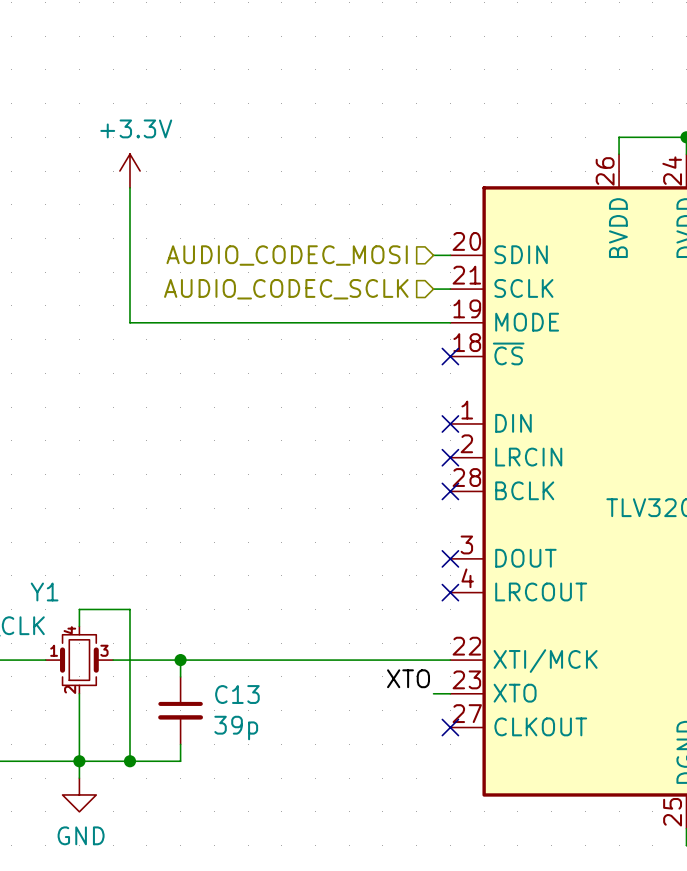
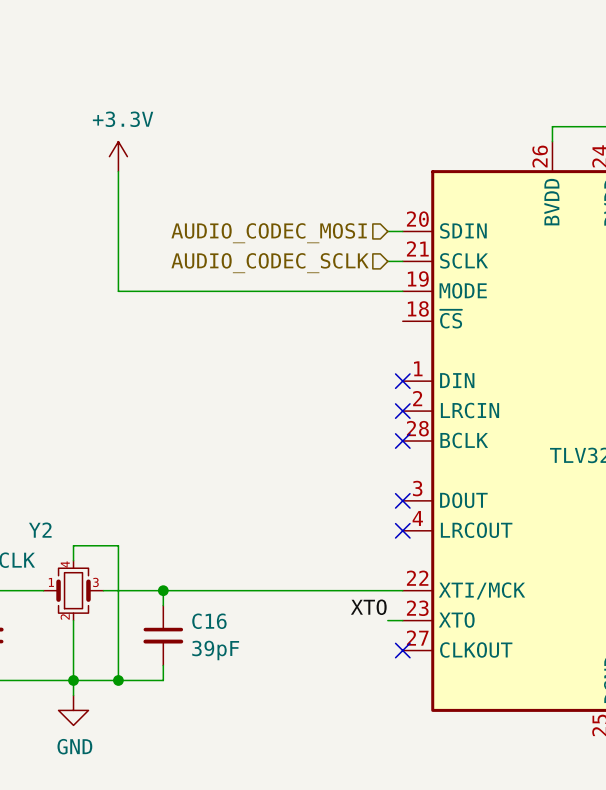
no-connect mark: (450, 356) -> none
Y1 name: Y1 (44, 591) -> Y2 (40, 530)
C13 name: C13 (237, 694) -> C16 (209, 621)
C13 value: 39p (236, 728) -> 39pF (215, 650)

